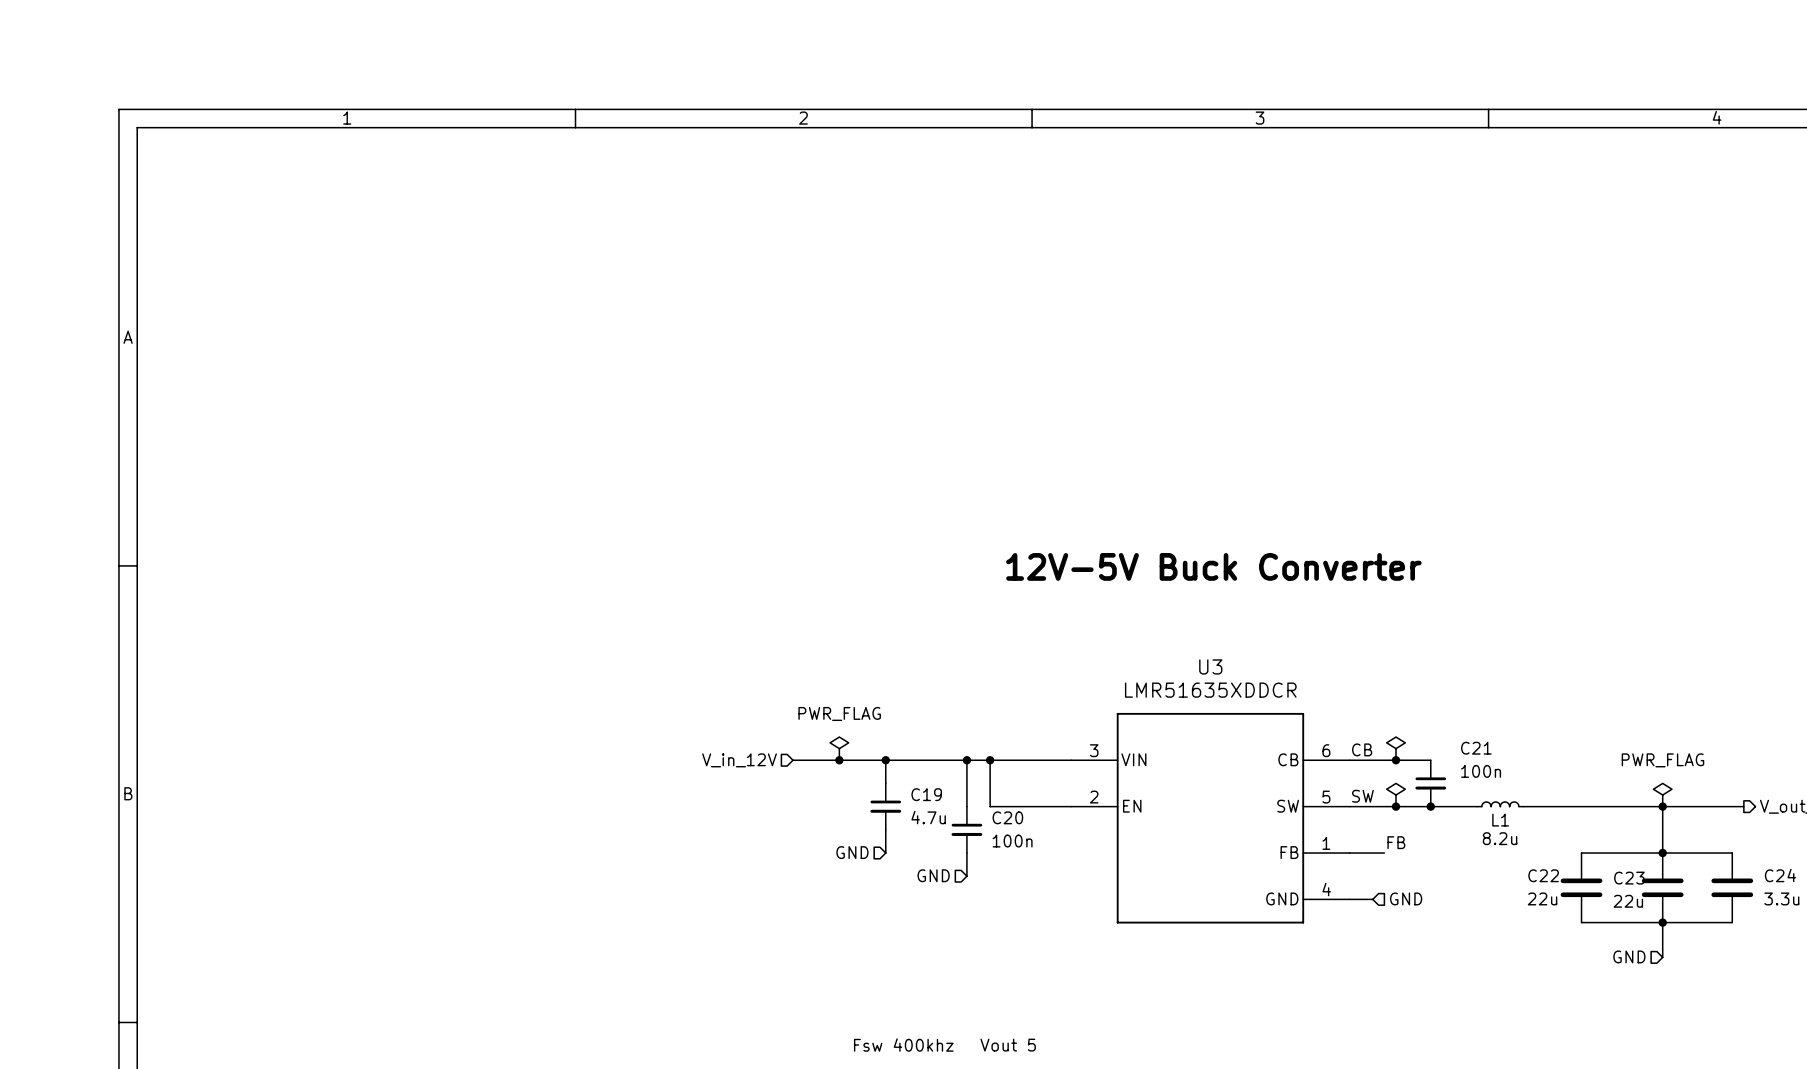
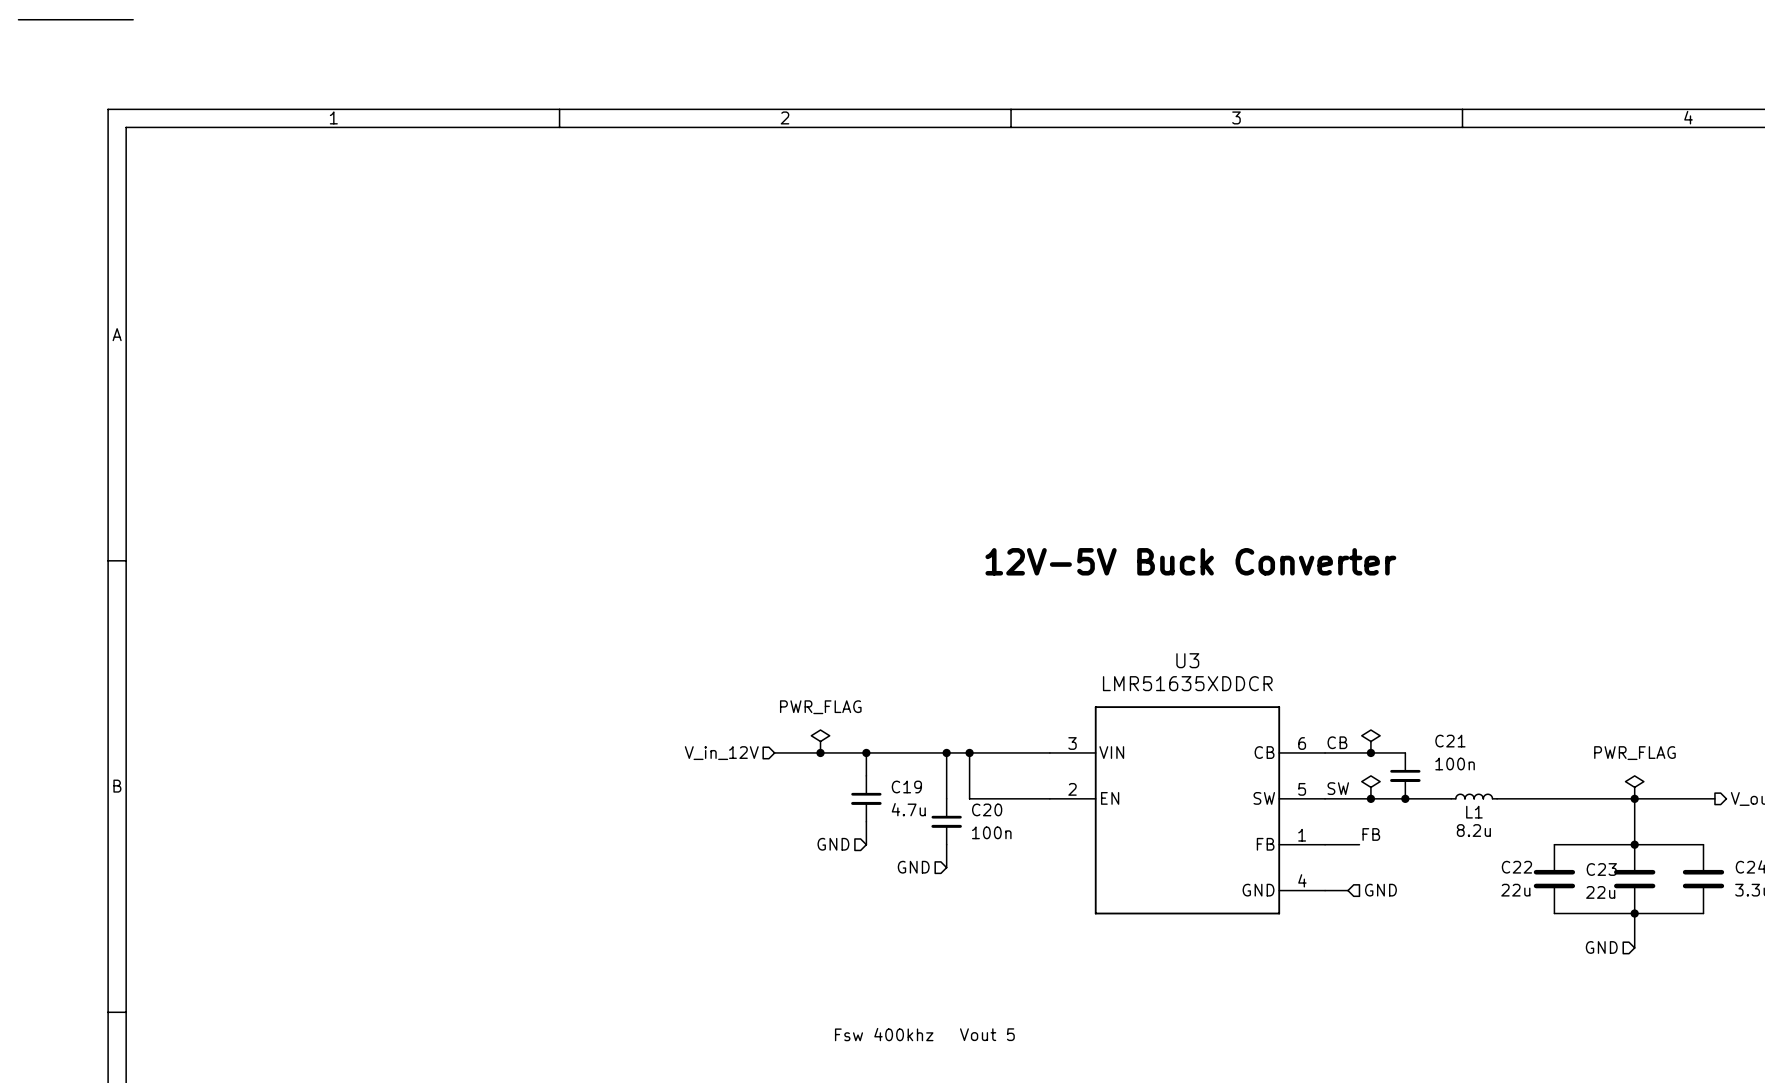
wire: none -> (18, 19) (133, 19)

